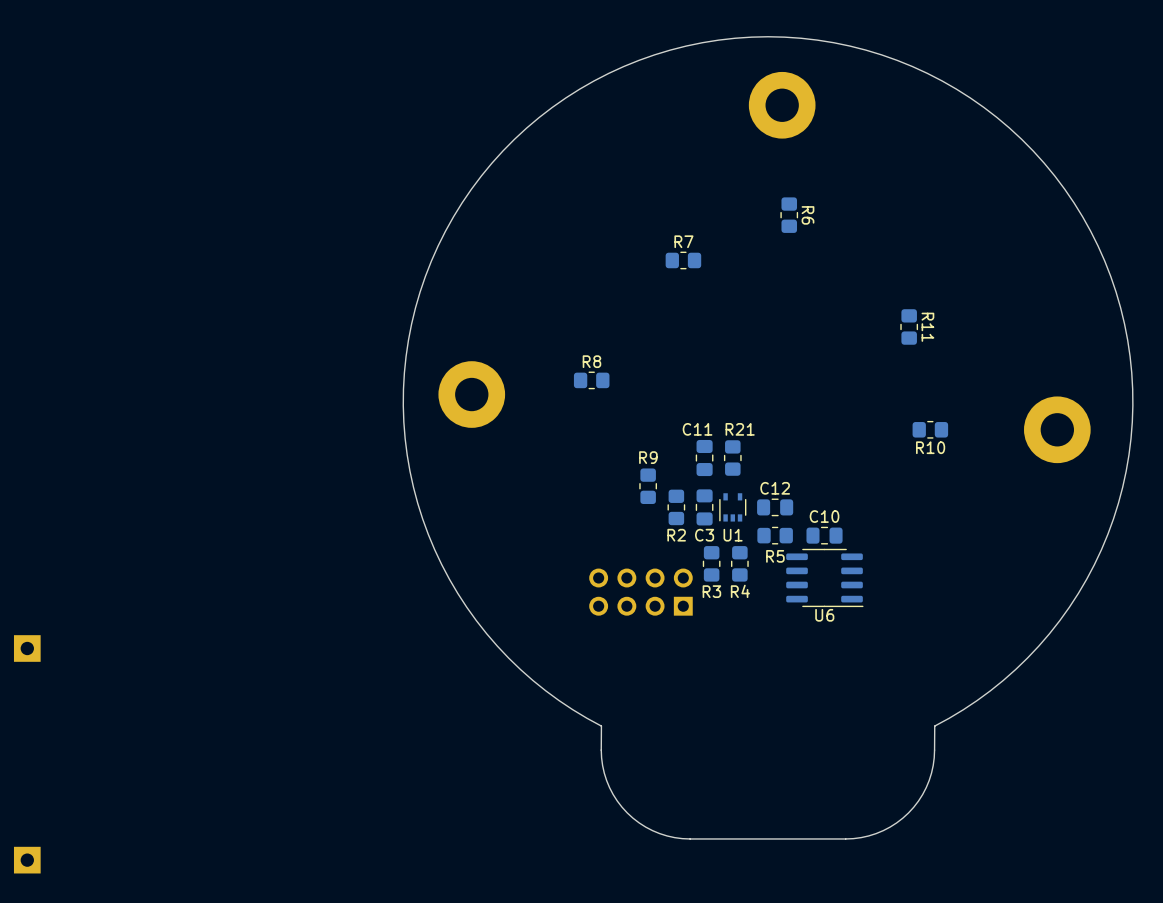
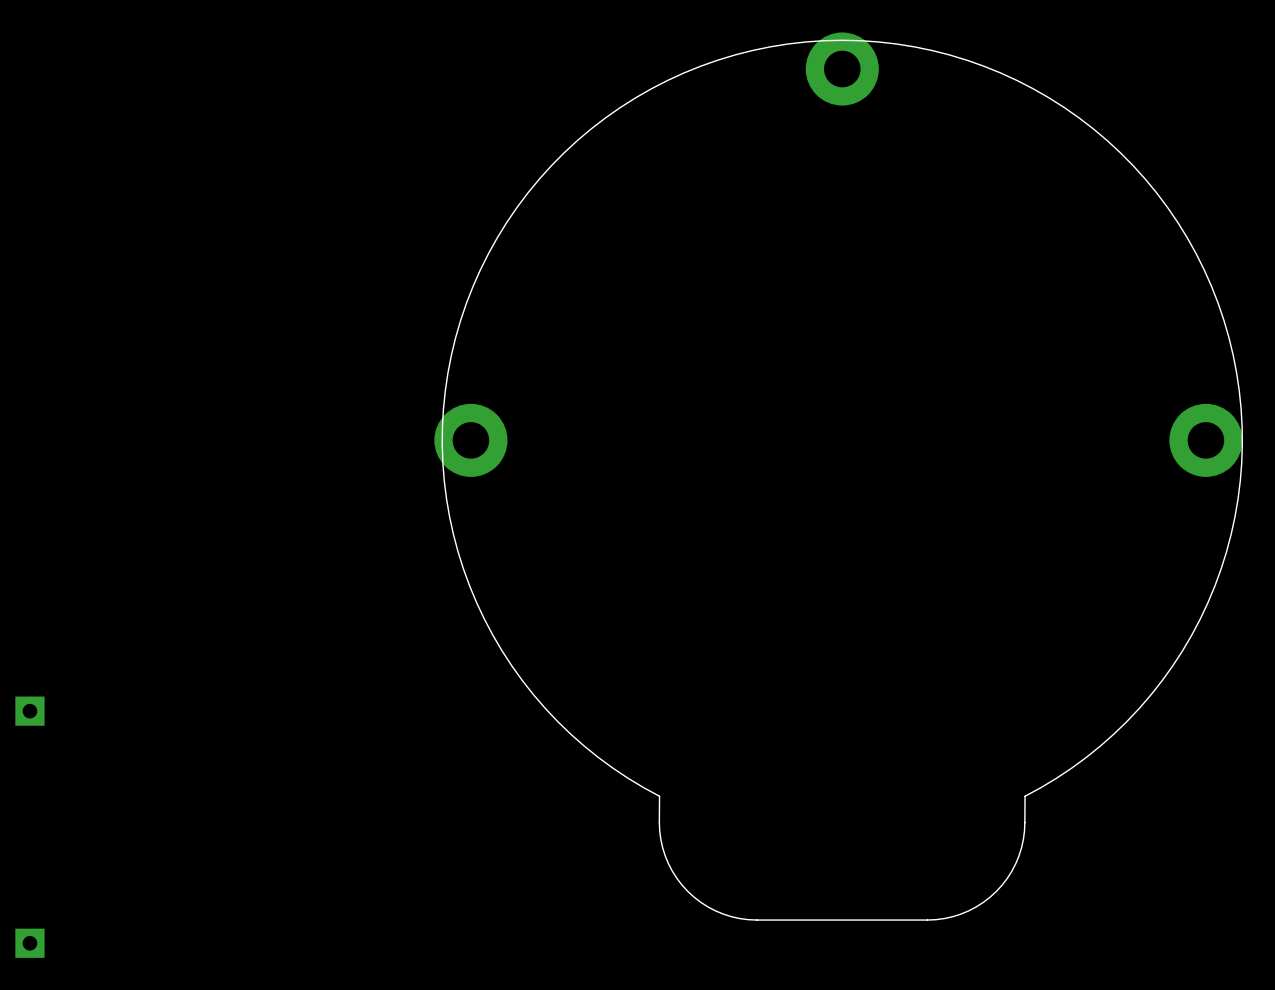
part position: (782, 105) -> (842, 69)
R6: (789, 215) -> none
R7: (683, 260) -> none
R11: (909, 326) -> none
R8: (591, 380) -> none
part position: (471, 394) -> (470, 440)
R10: (930, 429) -> none
part position: (1057, 429) -> (1205, 440)
C11: (704, 458) -> none
R21: (732, 458) -> none
R9: (648, 486) -> none
R2: (676, 507) -> none
C3: (704, 507) -> none
U1: (732, 507) -> none
C12: (775, 507) -> none
R5: (775, 535) -> none
C10: (824, 535) -> none
R3: (711, 563) -> none
R4: (739, 563) -> none
U6: (824, 577) -> none
part: (640, 592) -> none

